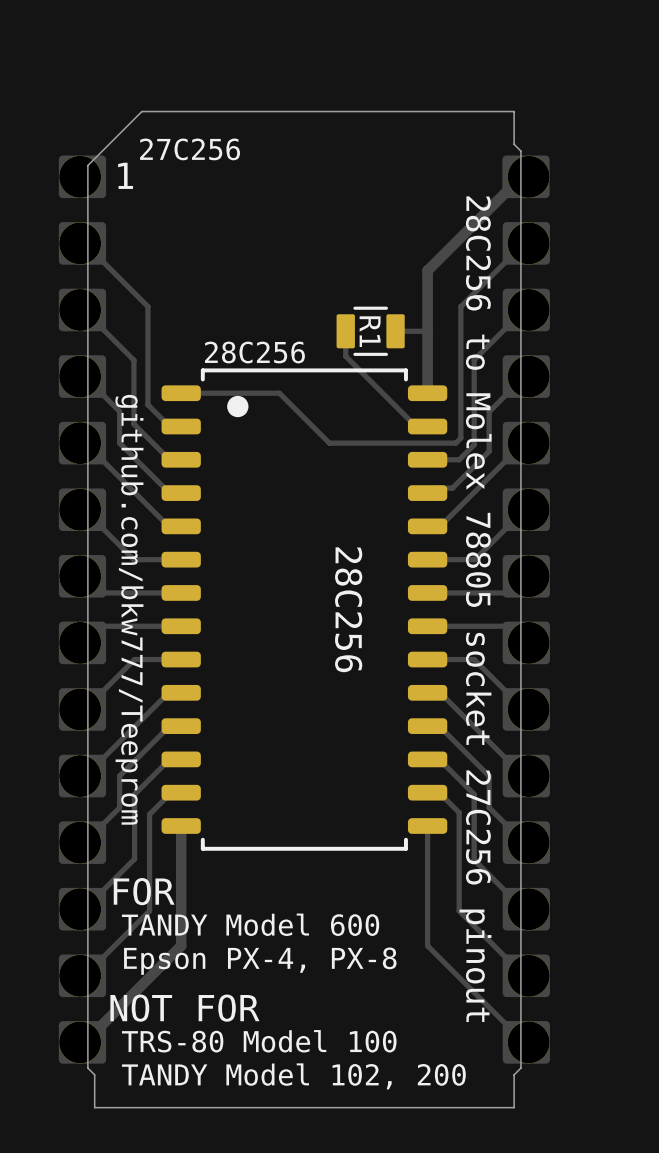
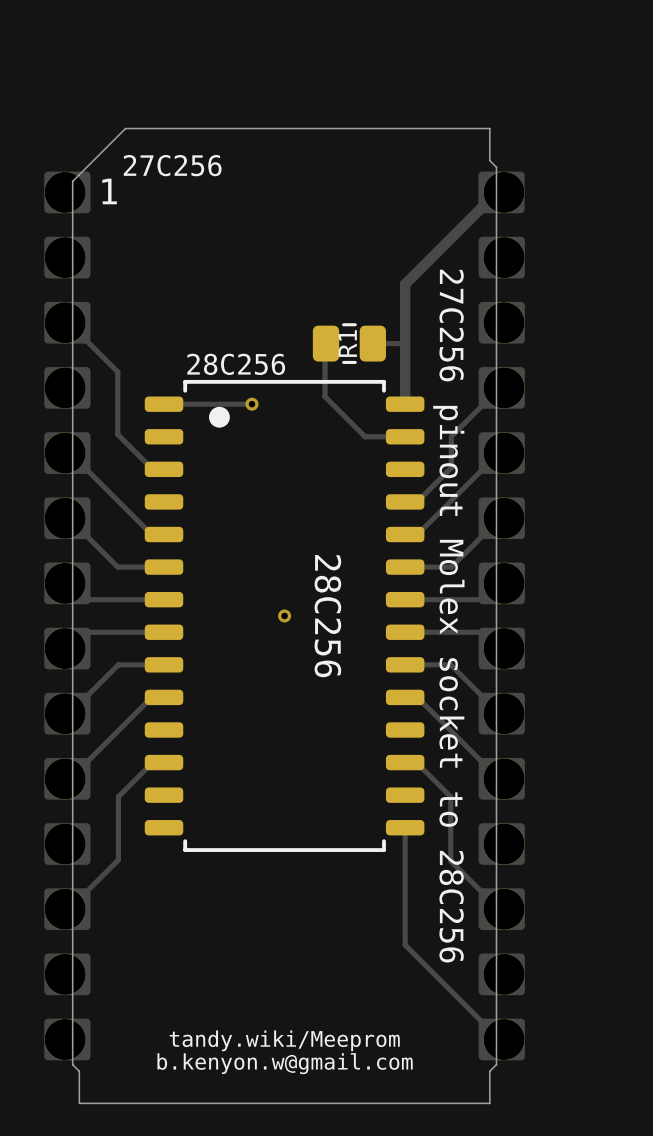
track: (80, 243) (84, 243) (147, 306) (147, 404) (169, 426) (181, 426) -> none
track: (528, 243) (524, 243) (460, 306) (460, 438) (455, 443) (329, 443) (279, 393) (271, 393) -> none
R1 footprint: [336, 306, 405, 356] -> [312, 323, 386, 364]
track: (528, 309) (524, 309) (474, 359) (474, 444) (459, 459) (427, 459) -> none
R1 name rotation: 0° (370, 331) -> 180° (347, 343)
track: (345, 356) (415, 426) -> (325, 368) (325, 396) (365, 436) (393, 436)
track: (80, 376) (84, 376) (119, 411) (119, 443) (169, 493) (181, 493) -> none
via: none -> (252, 404)
track: (489, 411) (489, 451) (452, 488) (432, 488) (427, 493) -> (465, 422) (451, 436) (451, 467) (417, 501) (405, 501)
text: github.com/bkw777/Teeprom (129, 609) -> none
via: none -> (284, 615)
text: 28C256 to Molex 78805 socket 27C256 pinout (475, 609) -> 27C256 pinout Molex socket to 28C256 (448, 616)
track: (181, 726) (169, 726) (119, 776) (119, 807) (84, 842) (80, 842) -> none
track: (427, 726) (439, 726) (489, 776) (489, 807) (524, 842) (528, 842) -> none
track: (181, 792) (171, 792) (149, 814) (149, 910) (84, 975) (80, 975) -> none
track: (427, 792) (439, 792) (459, 812) (459, 910) (524, 975) (528, 975) -> none
track: (181, 825) (181, 945) (84, 1042) (80, 1042) -> none
text: FOR (144, 891) -> none
text: TANDY Model 600 (250, 924) -> none
text: Epson PX-4, PX-8 (260, 961) -> none
text: NOT FOR (184, 1008) -> none
text: TRS-80 Model 100 (259, 1041) -> none
text: none -> tandy.wiki/Meeprom (284, 1040)
text: none -> b.kenyon.w@gmail.com (285, 1063)
text: TANDY Model 102, 200 (293, 1076) -> none

